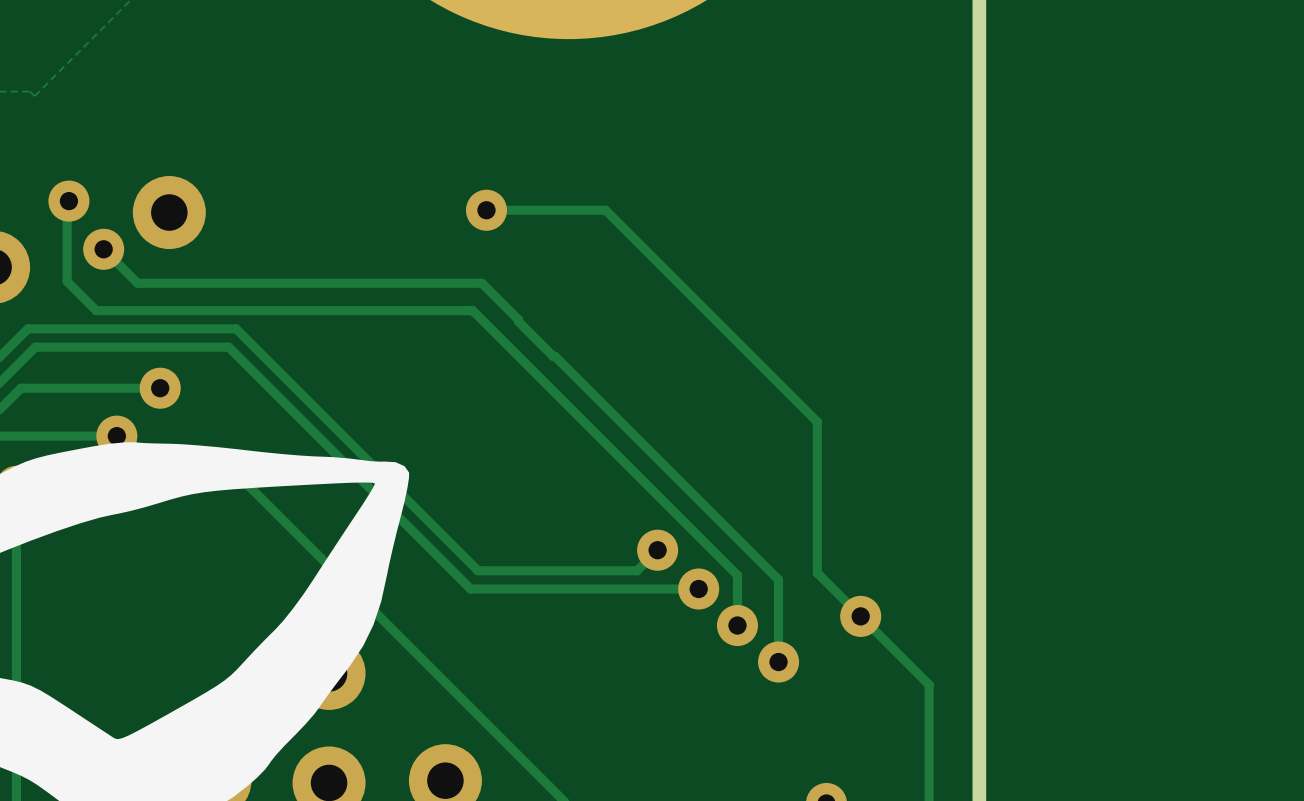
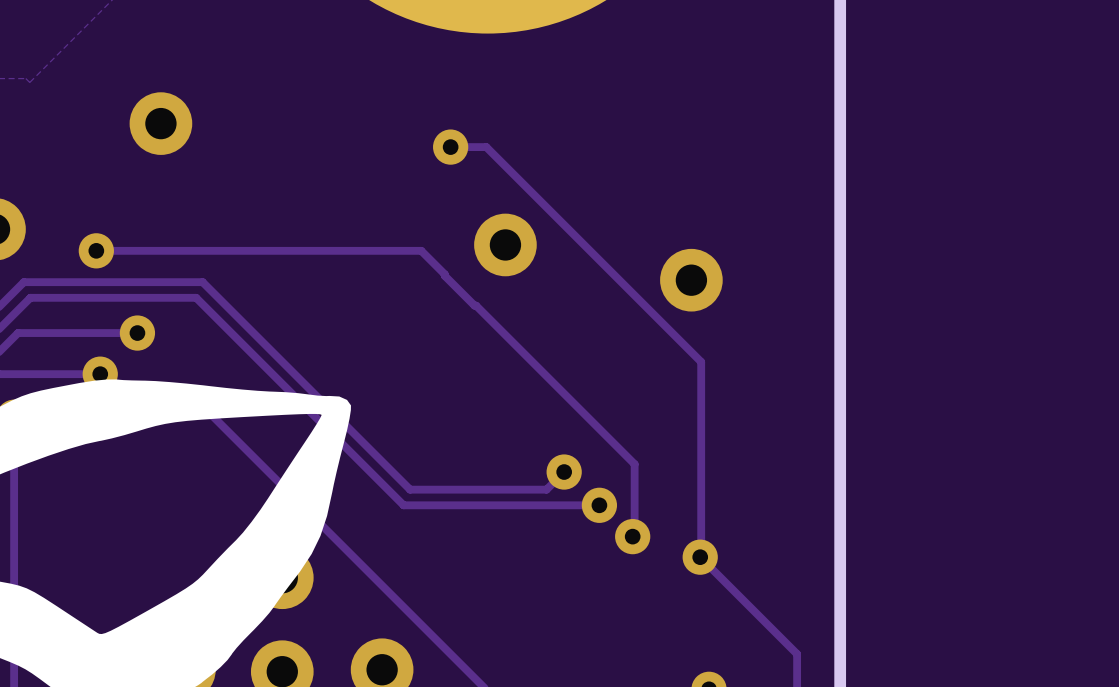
track: (68, 201) (67, 202) (67, 281) (96, 310) (472, 310) (737, 575) (737, 625) -> none
via: (68, 201) -> none
via position: (486, 210) -> (450, 147)
track: (605, 210) (486, 210) -> (519, 180) (486, 147) (450, 147)
via position: (169, 212) -> (160, 123)
track: (103, 249) (137, 283) (481, 283) (491, 292) -> (96, 250) (421, 250)
via position: (103, 249) -> (96, 250)
via: none -> (505, 244)
via: none -> (691, 280)
track: (739, 541) (778, 579) (778, 662) -> (634, 464) (634, 538)
track: (817, 573) (929, 684) (929, 762) -> (700, 557) (797, 654)
track: none -> (701, 491) (701, 556)
via: (860, 616) -> none
via position: (778, 662) -> (700, 557)

